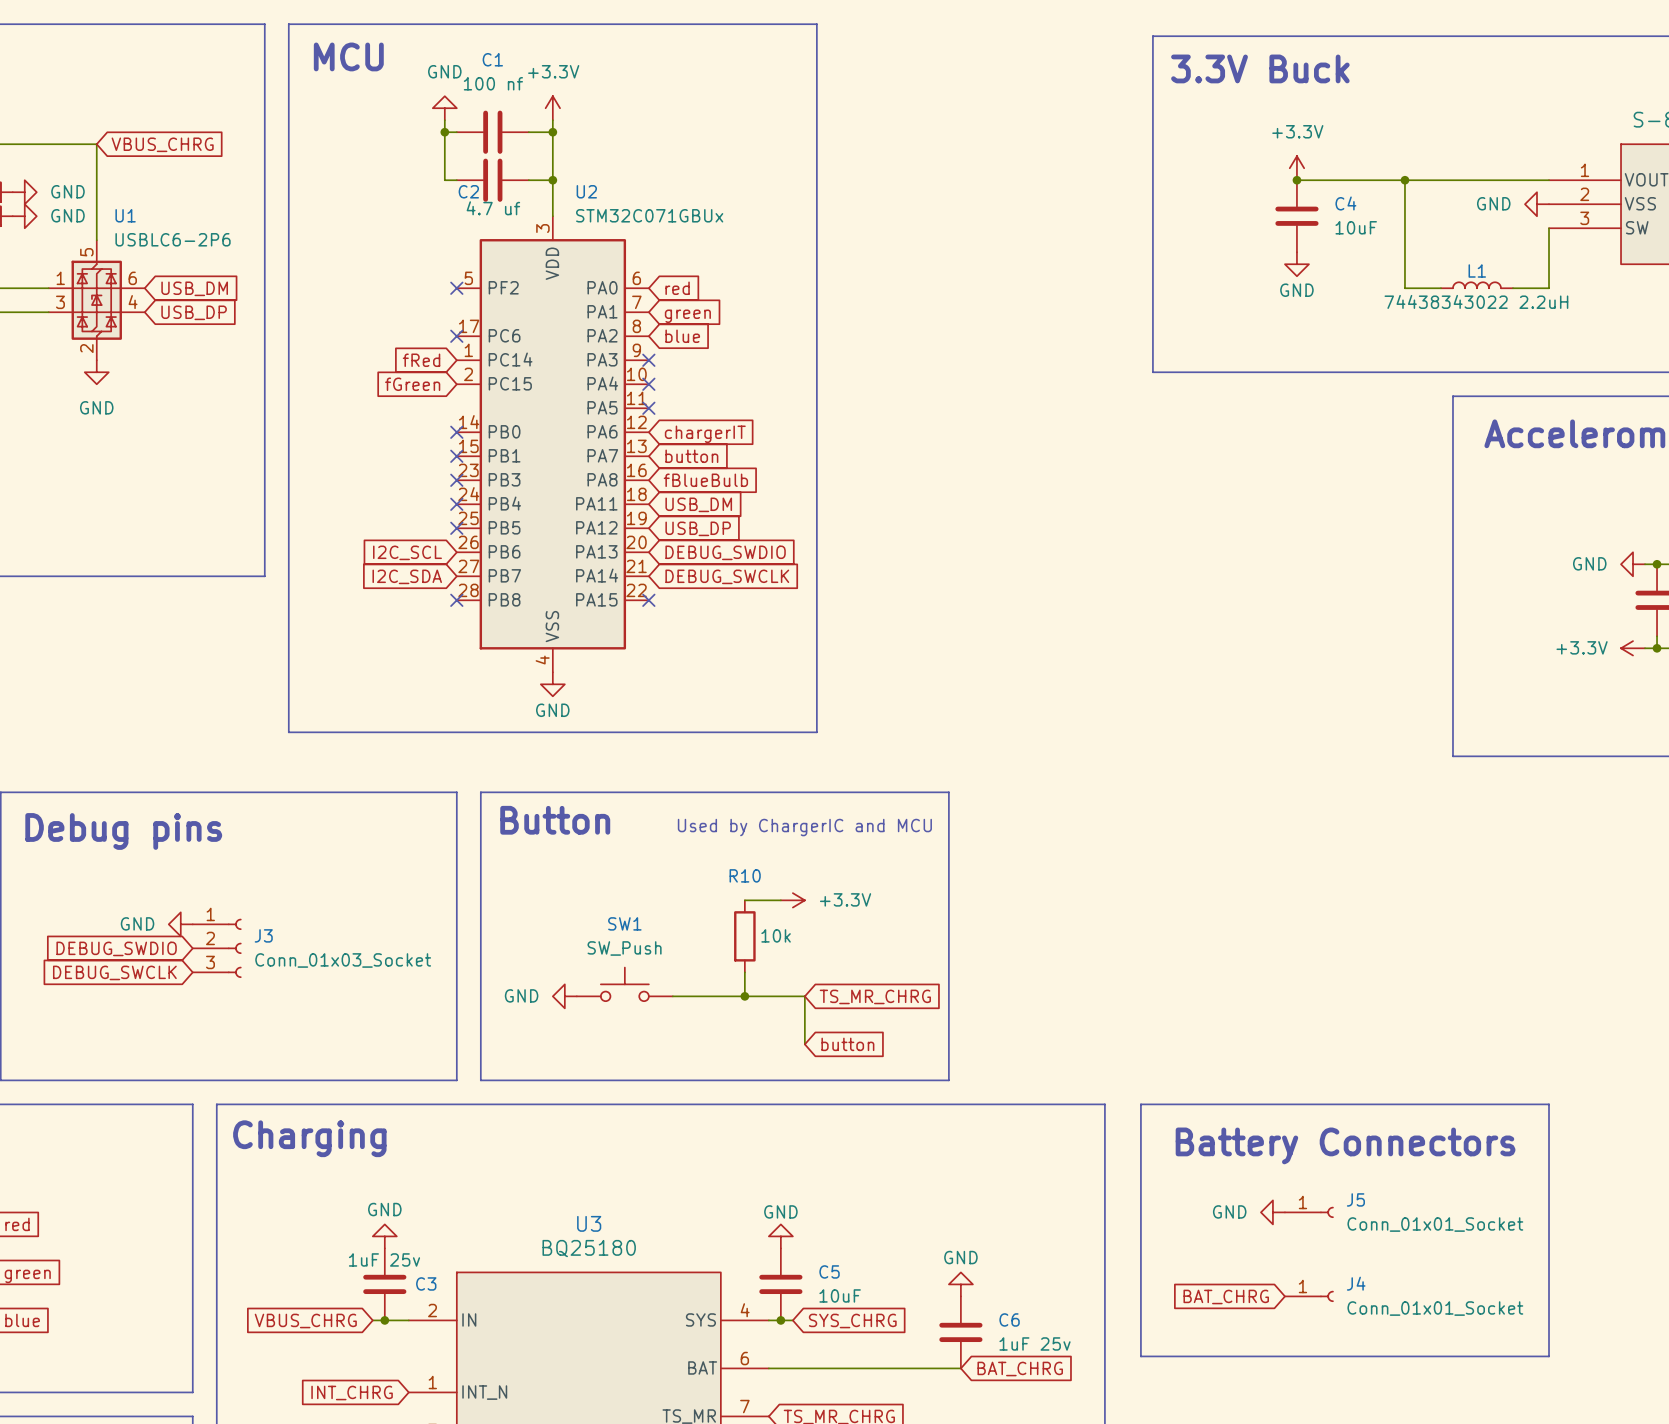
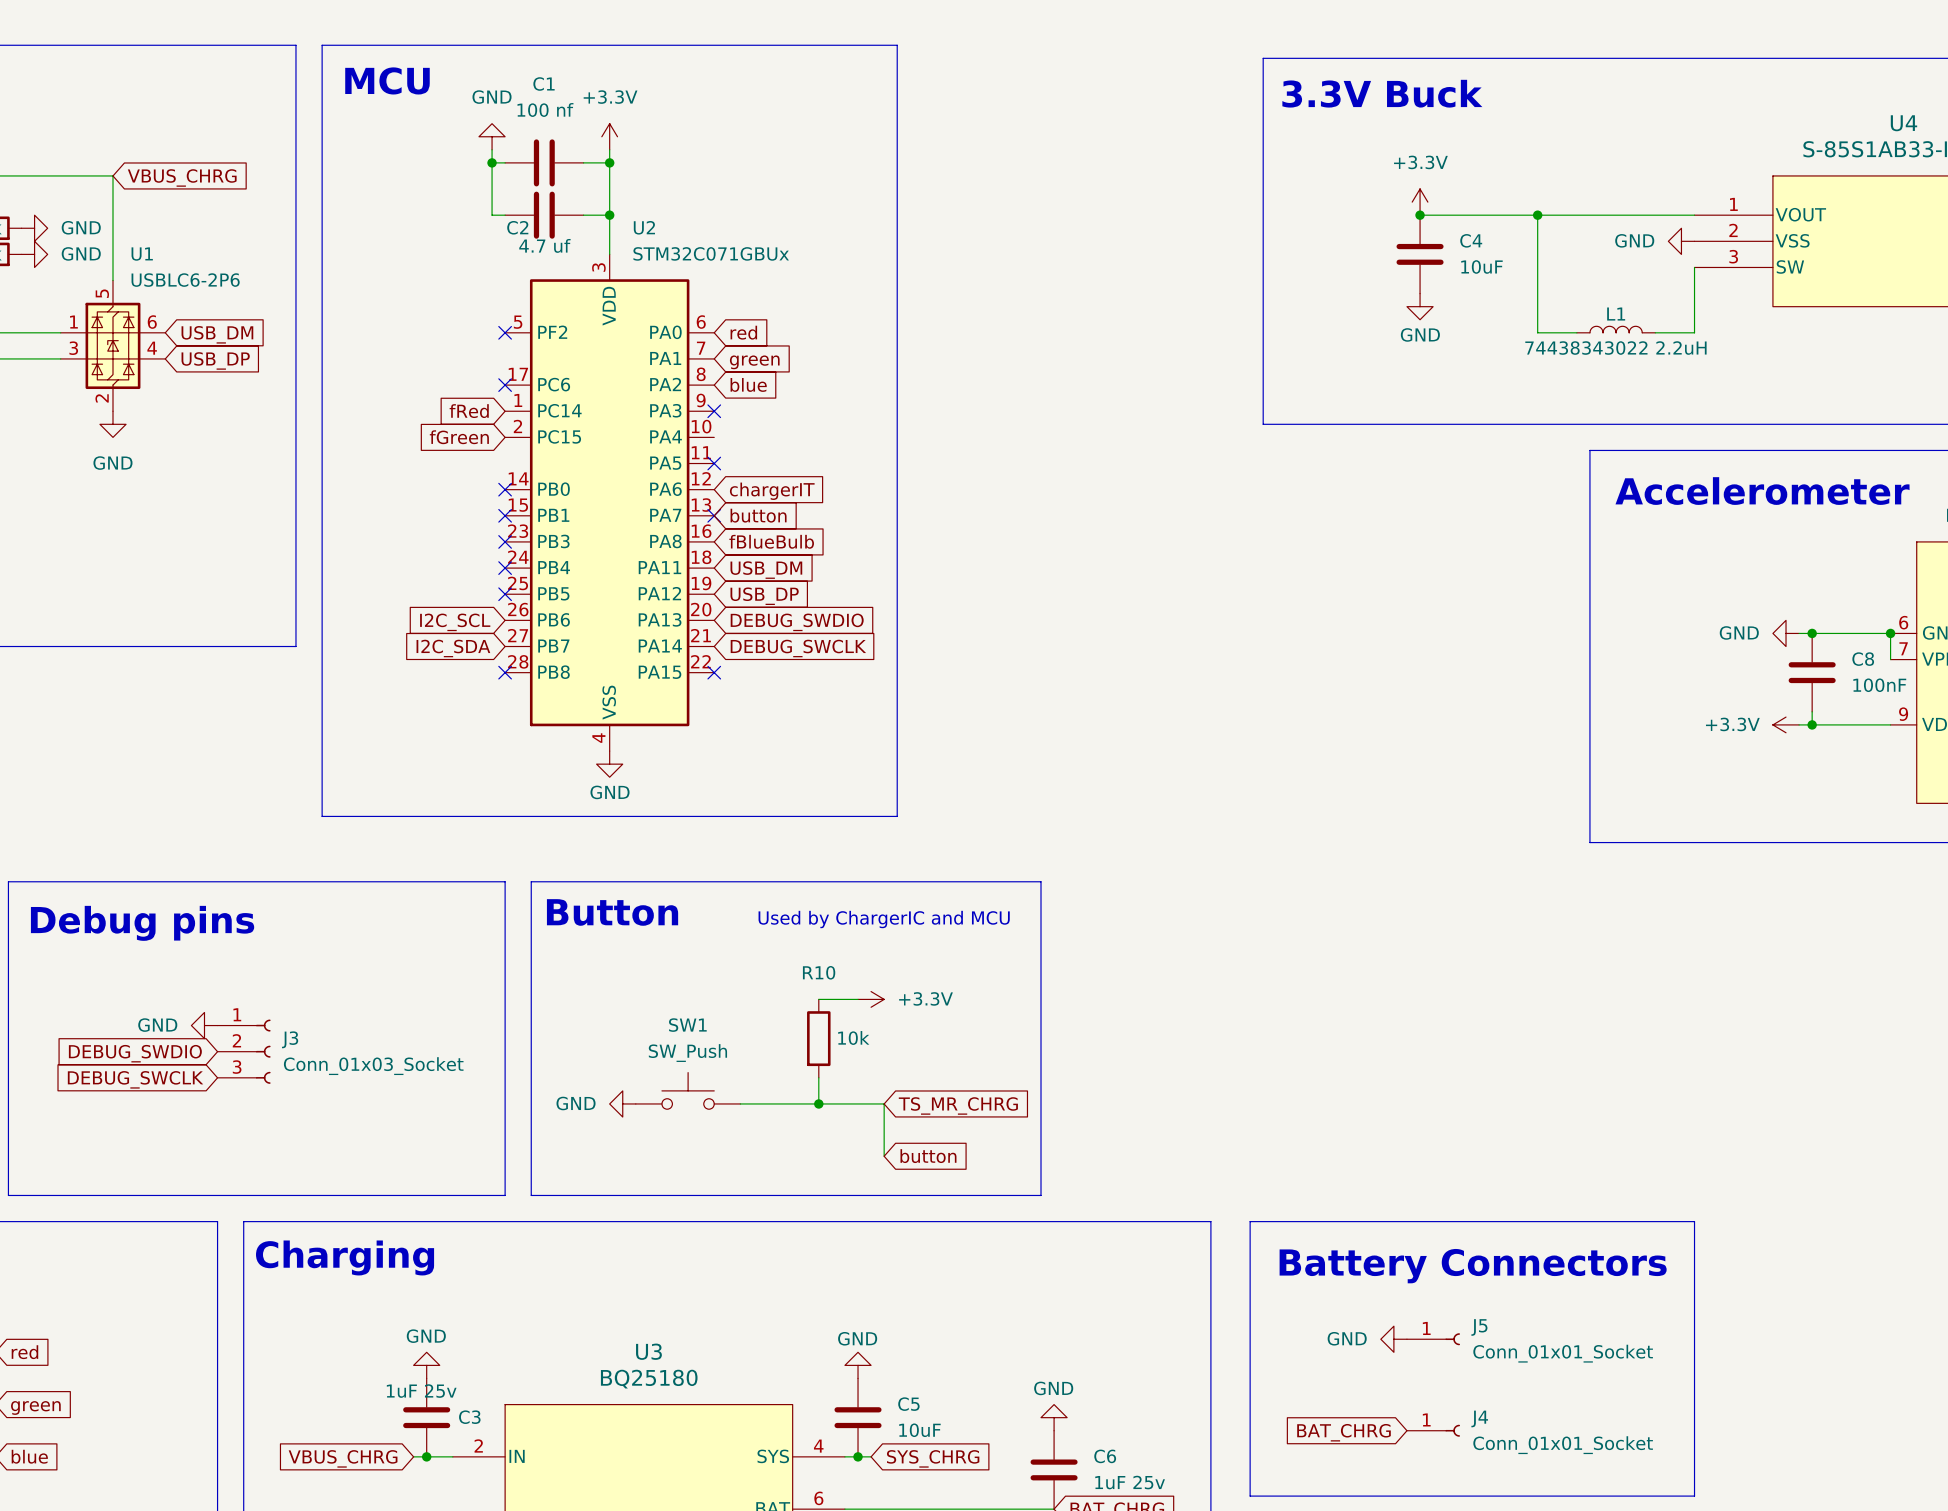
no-connect mark: (648, 384) -> none
no-connect mark: none -> (714, 515)

